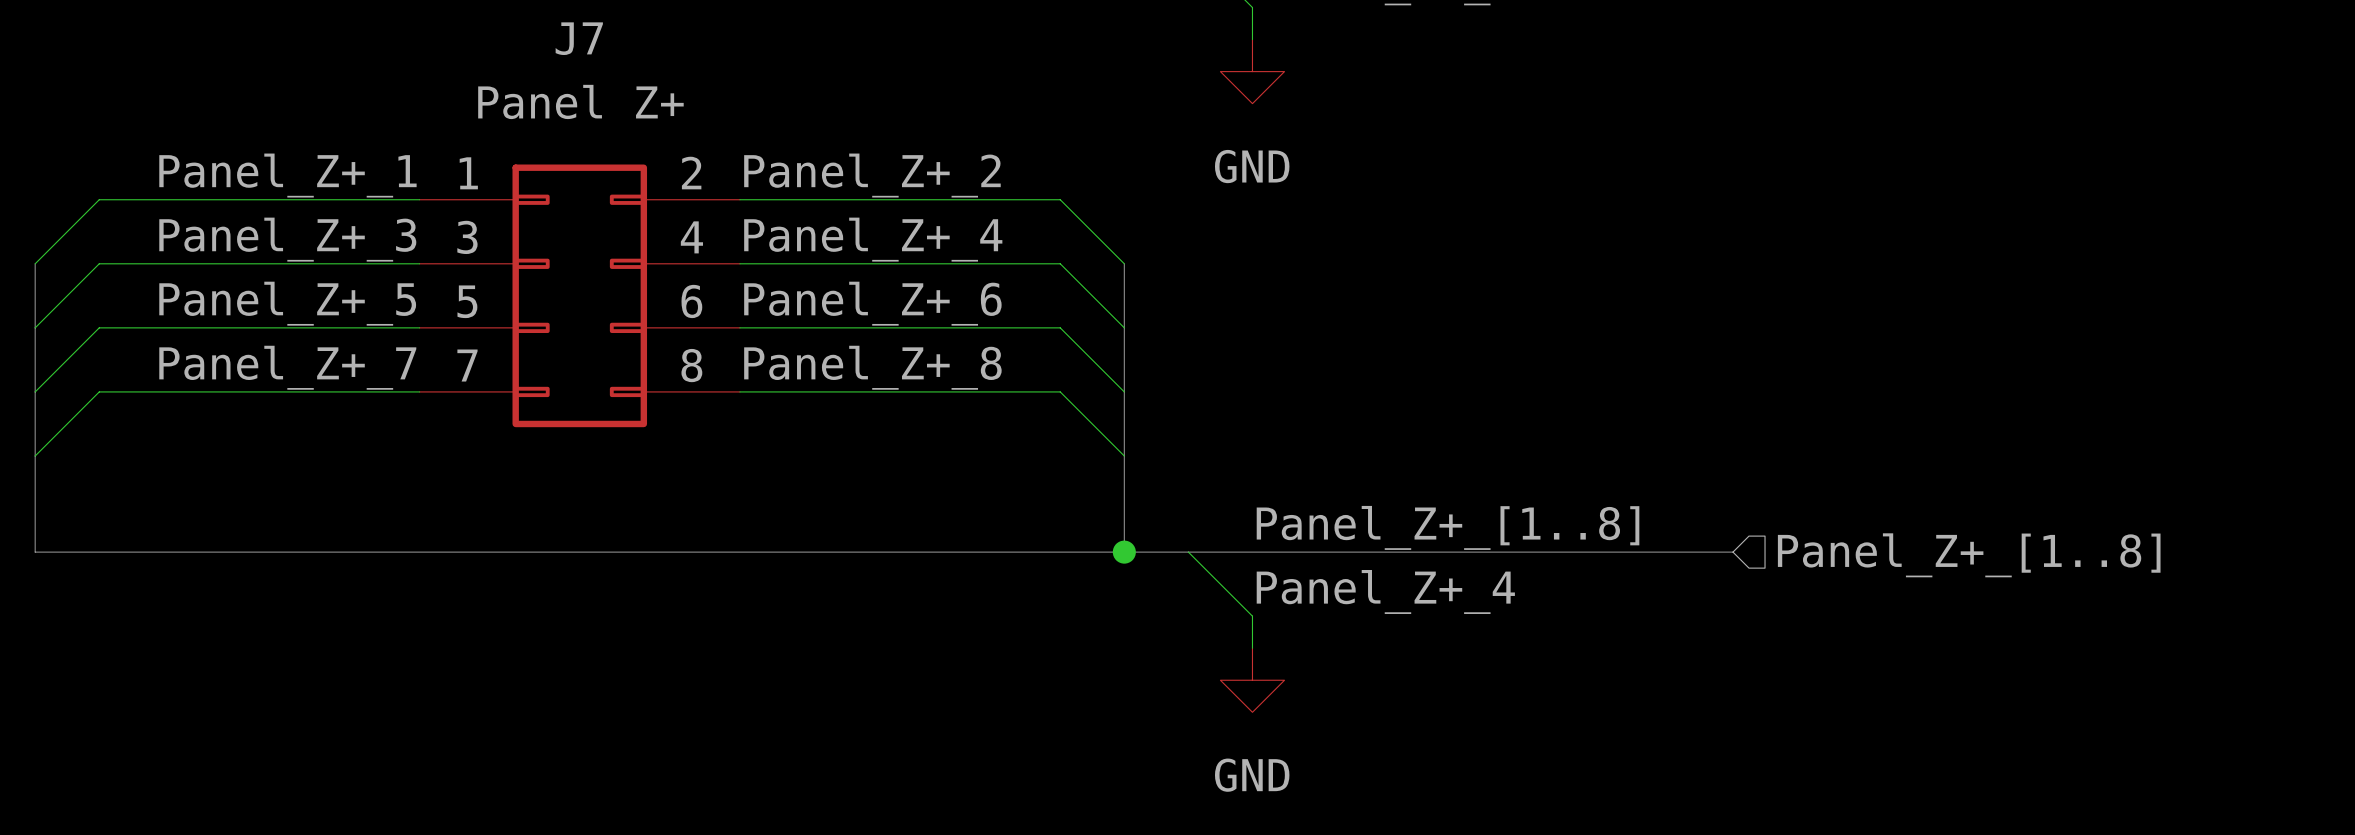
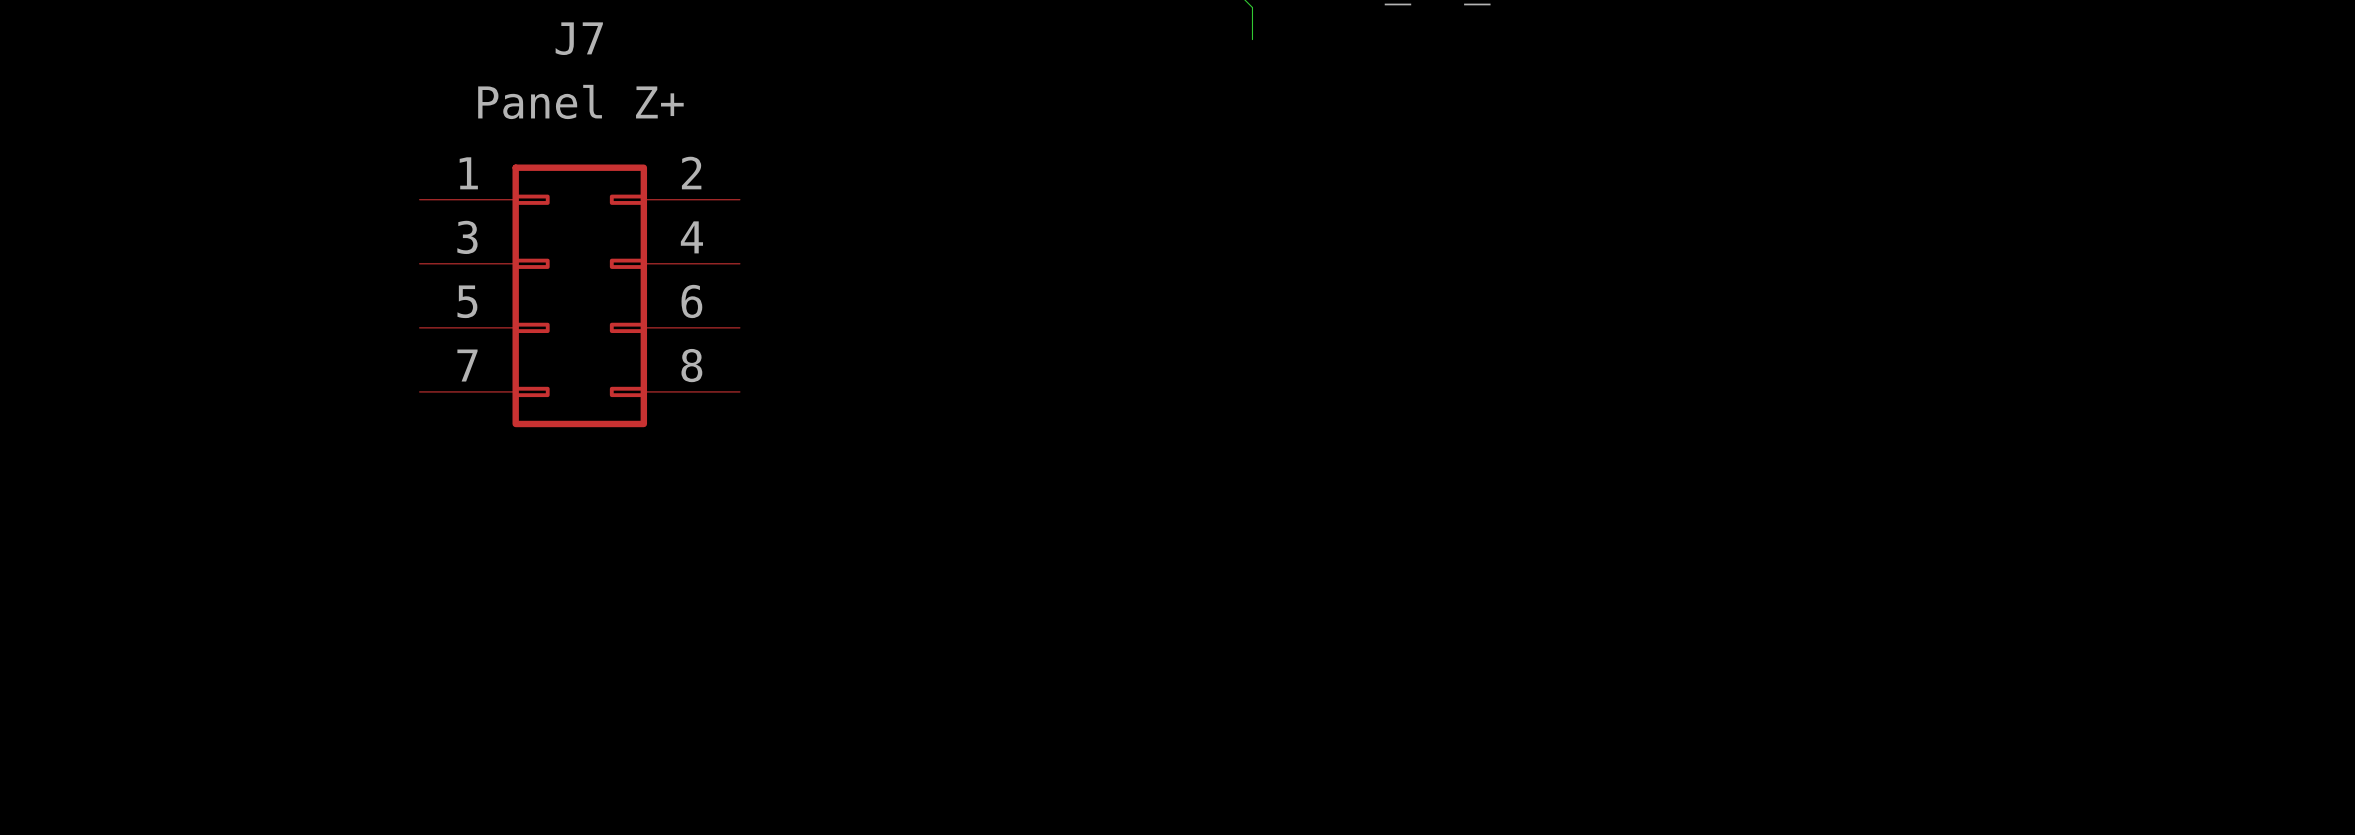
power symbol: GND (1252, 71) -> none
label: Panel_Z+_1 (287, 175) -> none
label: Panel_Z+_2 (872, 175) -> none
wire: (419, 199) (99, 199) (35, 263) -> none
wire: (739, 199) (1060, 199) (1124, 263) -> none
label: Panel_Z+_3 (287, 239) -> none
label: Panel_Z+_4 (873, 239) -> none
bus: (35, 263) (35, 552) (1732, 552) -> none
wire: (419, 263) (99, 263) (35, 327) -> none
wire: (739, 263) (1060, 263) (1124, 327) -> none
bus: (1124, 263) (1124, 552) -> none
label: Panel_Z+_5 (287, 303) -> none
label: Panel_Z+_6 (872, 303) -> none
wire: (419, 327) (99, 327) (35, 391) -> none
wire: (739, 327) (1060, 327) (1124, 391) -> none
label: Panel_Z+_7 (287, 367) -> none
label: Panel_Z+_8 (872, 367) -> none
wire: (419, 391) (99, 391) (35, 456) -> none
wire: (739, 391) (1060, 391) (1124, 456) -> none
label: Panel_Z+_[1..8] (1448, 527) -> none
junction: (1124, 552) -> none
wire: (1188, 552) (1252, 616) (1252, 648) -> none
hierarchical label: Panel_Z+_[1..8] (1969, 555) -> none
label: Panel_Z+_4 (1385, 591) -> none
power symbol: GND (1252, 680) -> none

